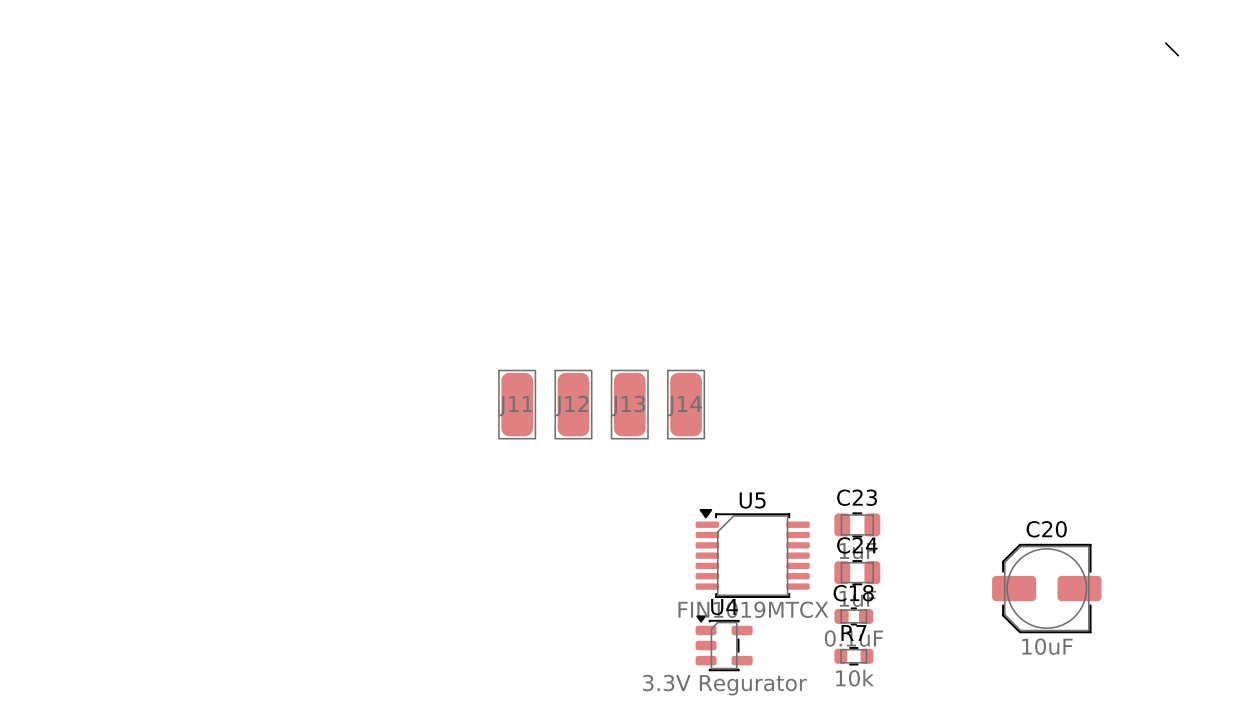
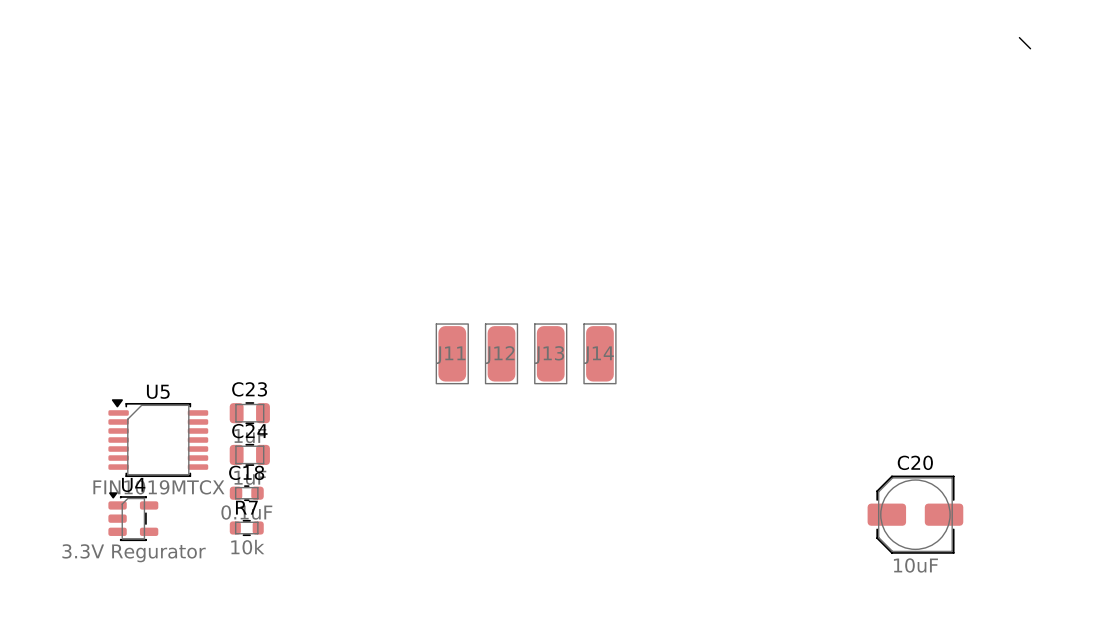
C23 position: (857, 524) -> (249, 413)
U5 position: (752, 553) -> (158, 438)
C24 position: (857, 572) -> (249, 454)
C18 position: (853, 616) -> (246, 493)
U4 position: (724, 643) -> (133, 516)
R7 position: (853, 656) -> (246, 527)

